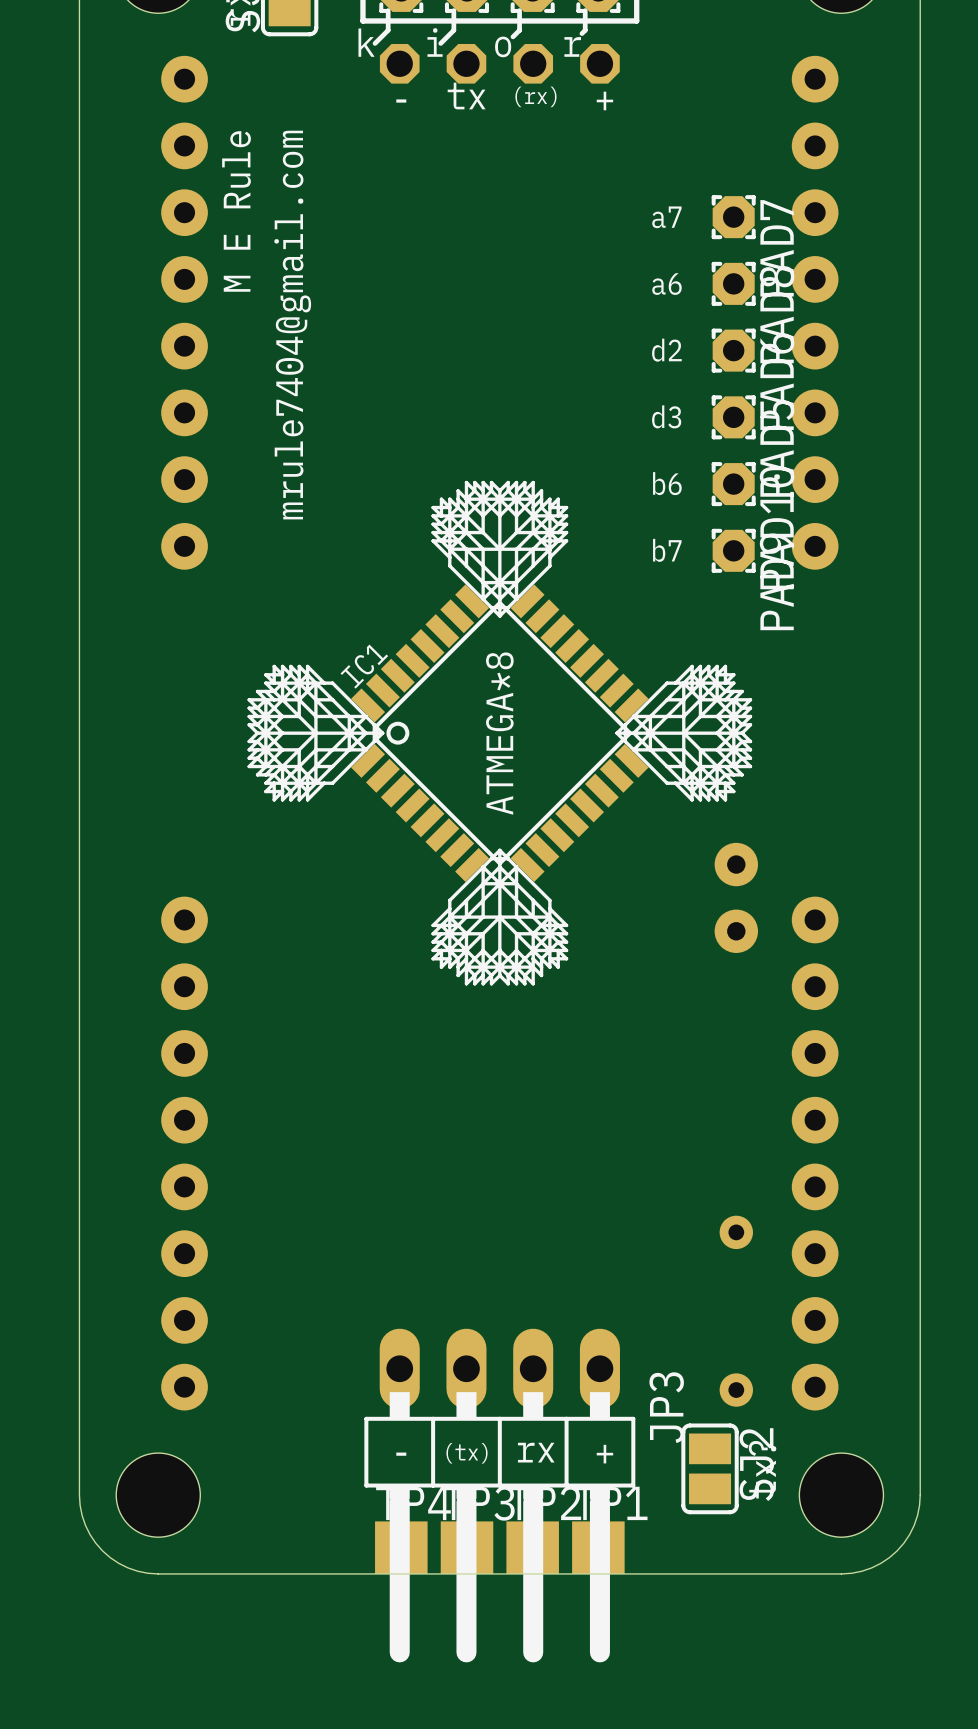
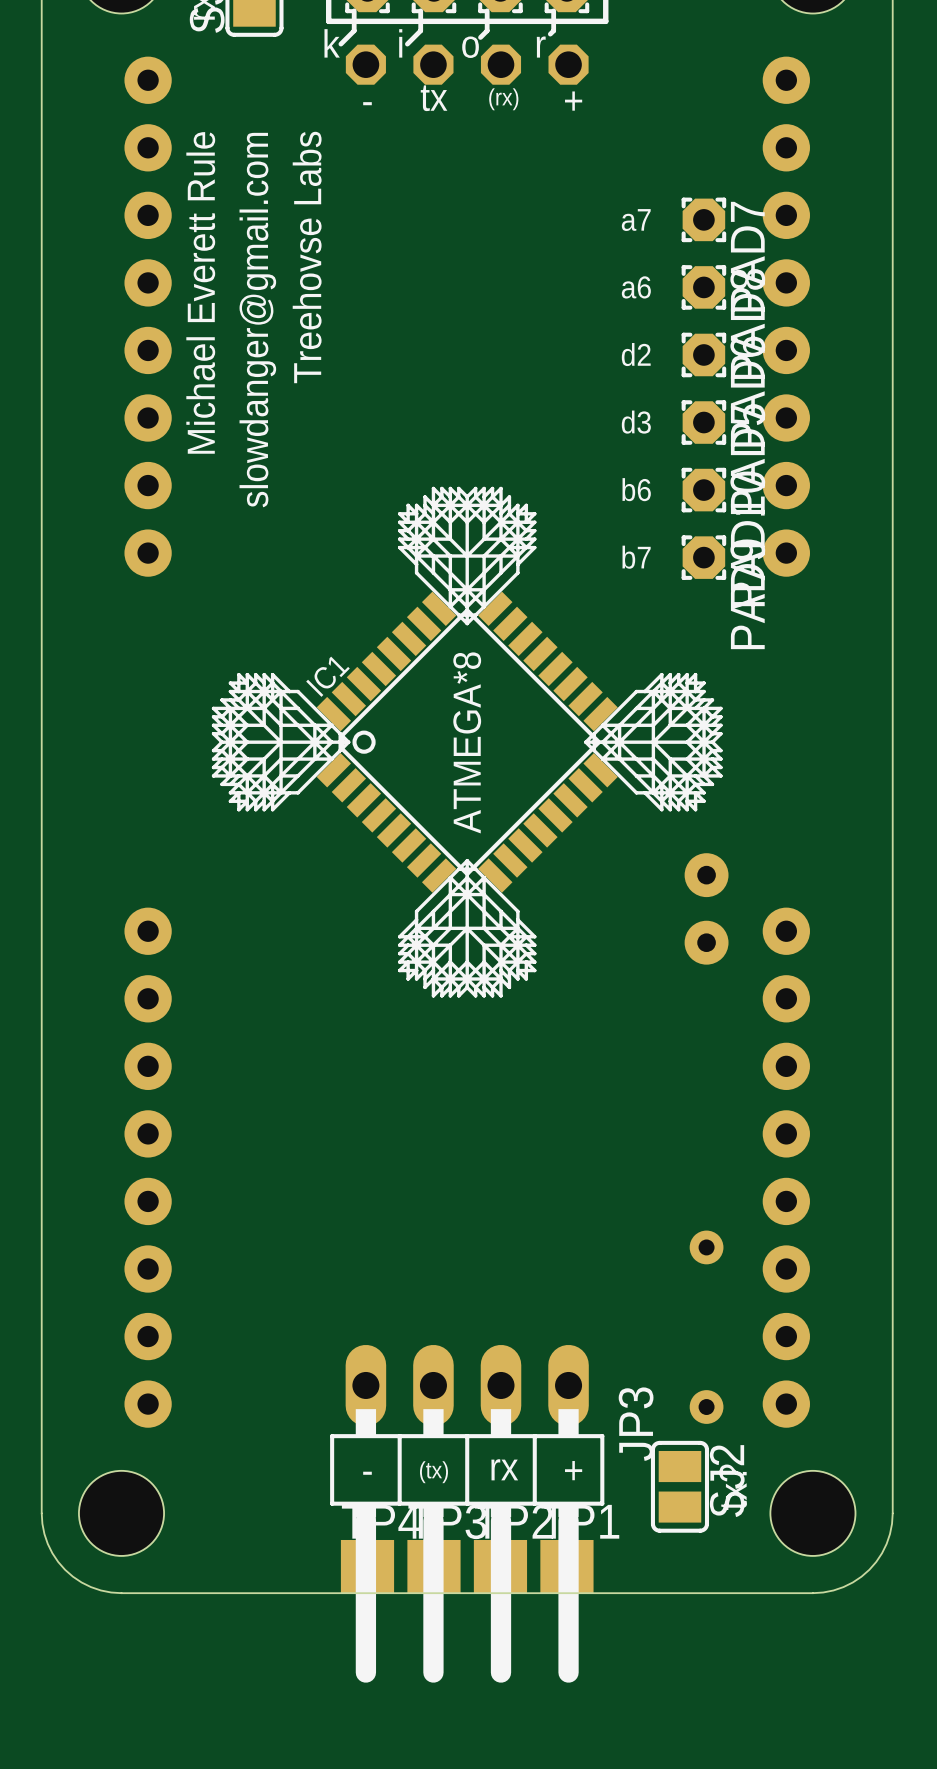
text: M E Rule (236, 211) -> Michael Everett Rule (200, 292)
text: none -> Treehovse Labs (307, 257)
text: mrule7404@gmail.com (292, 325) -> slowdanger@gmail.com (257, 320)

